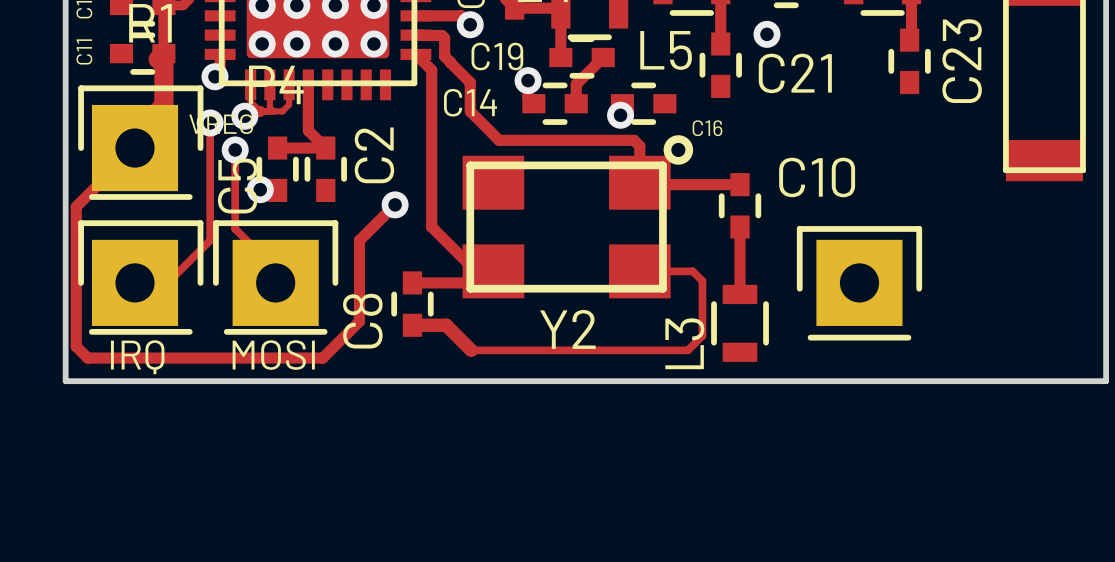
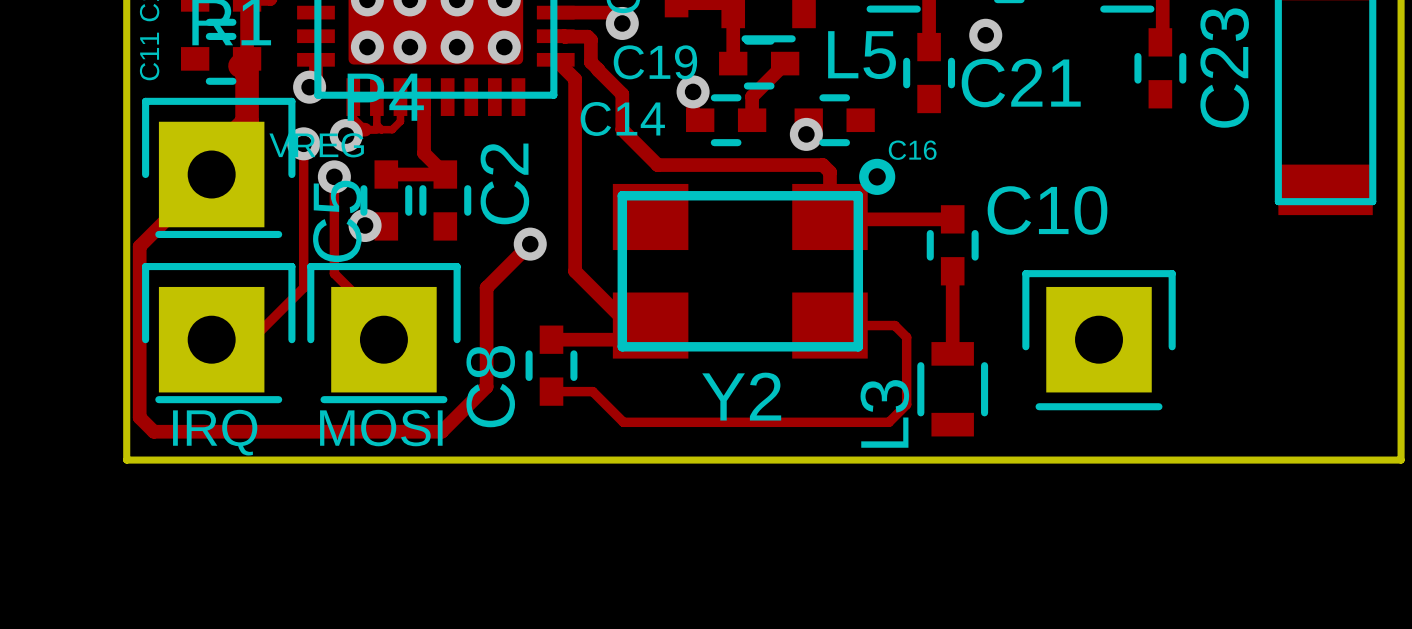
track width: thick (412, 325) (446, 325) (471, 350) -> thin (551, 391) (592, 391) (623, 422)

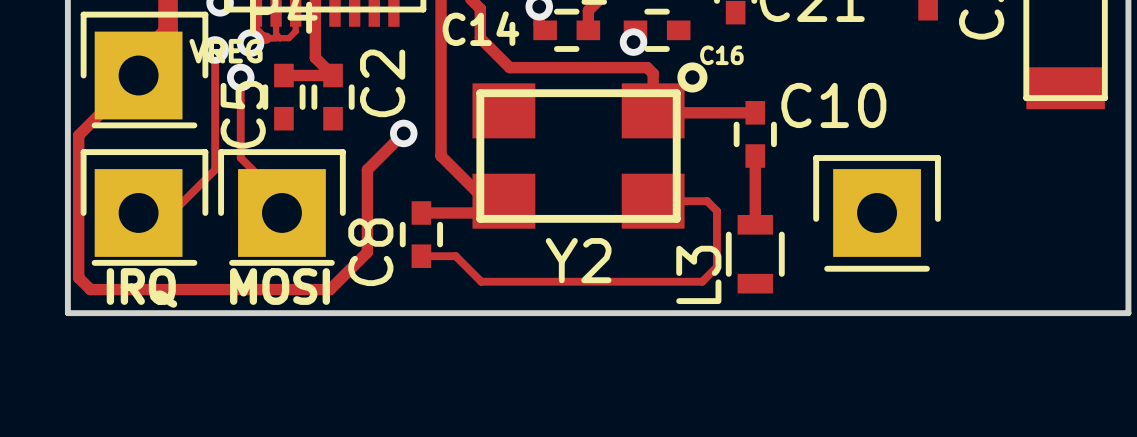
via: (365, 225) -> none

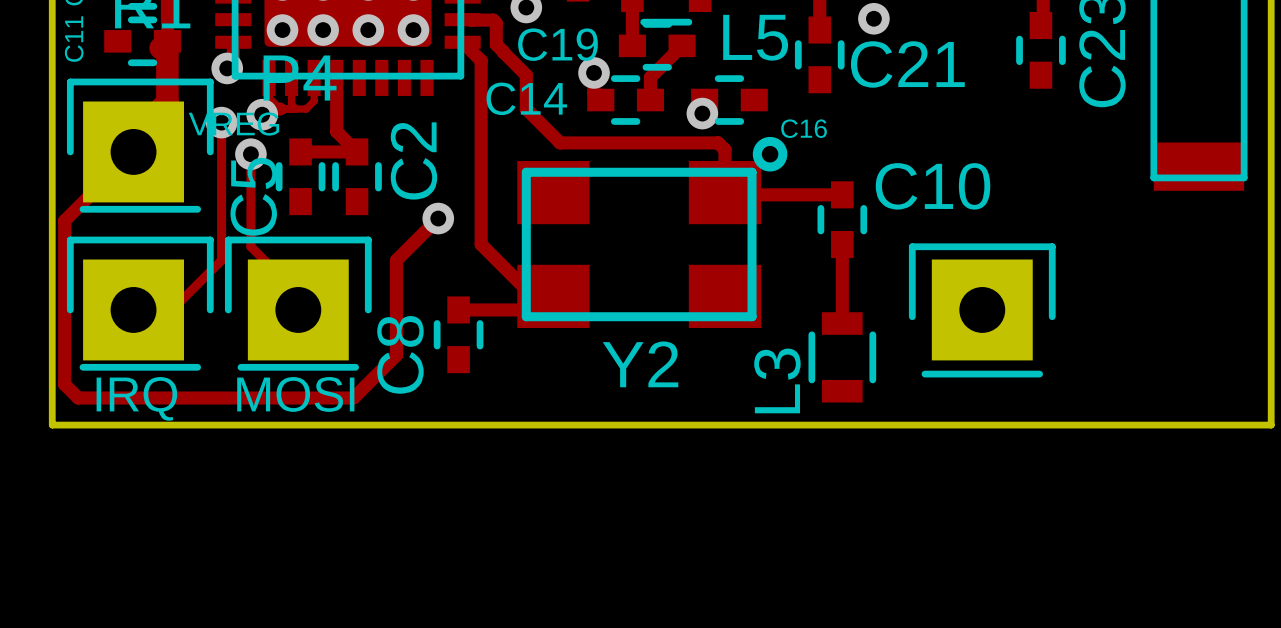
track: (653, 201) (707, 201) (716, 211) (716, 266) (702, 281) (481, 281) (455, 256) (421, 256) -> none

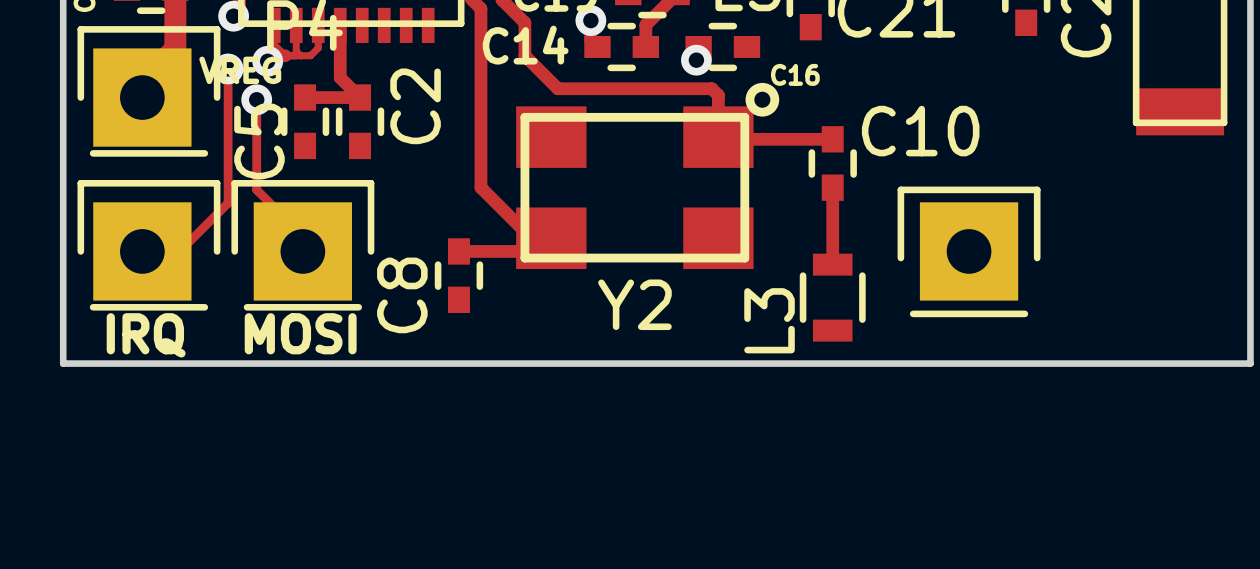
track: (133, 151) (64, 220) (64, 384) (78, 397) (353, 397) (396, 355) (396, 260) (438, 218) -> none
via: (438, 218) -> none

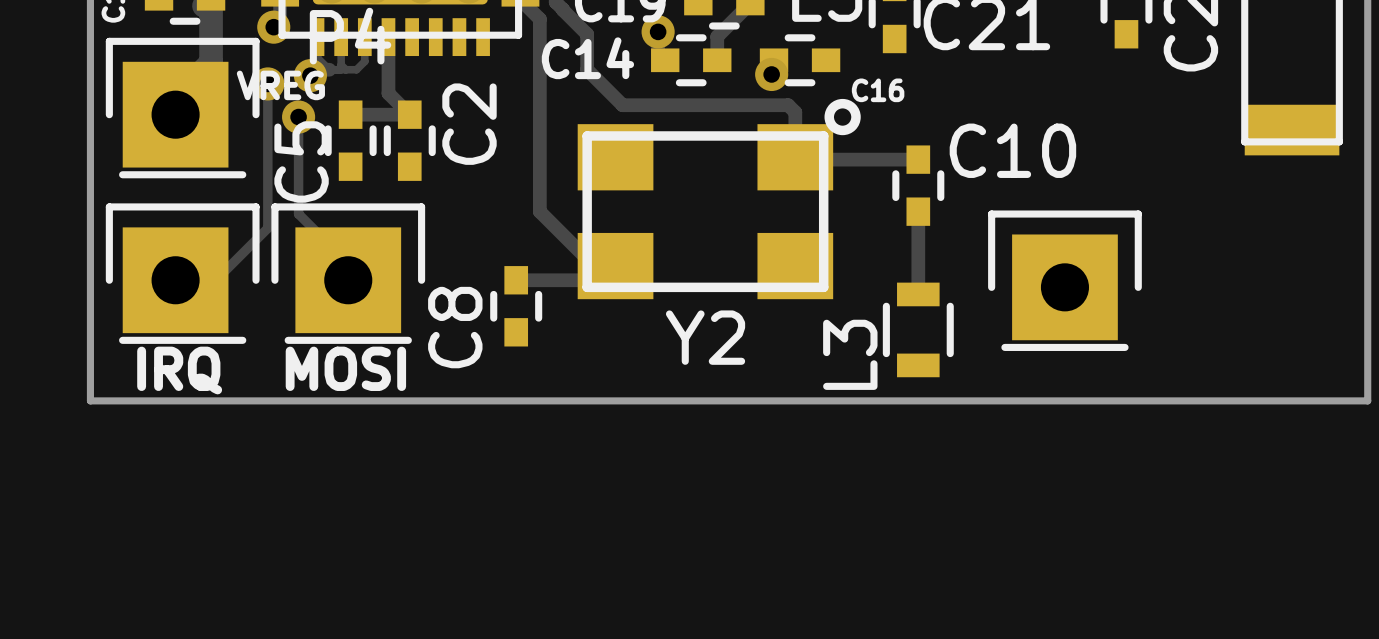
part footprint: [897, 186, 1041, 318] -> [988, 210, 1142, 351]

